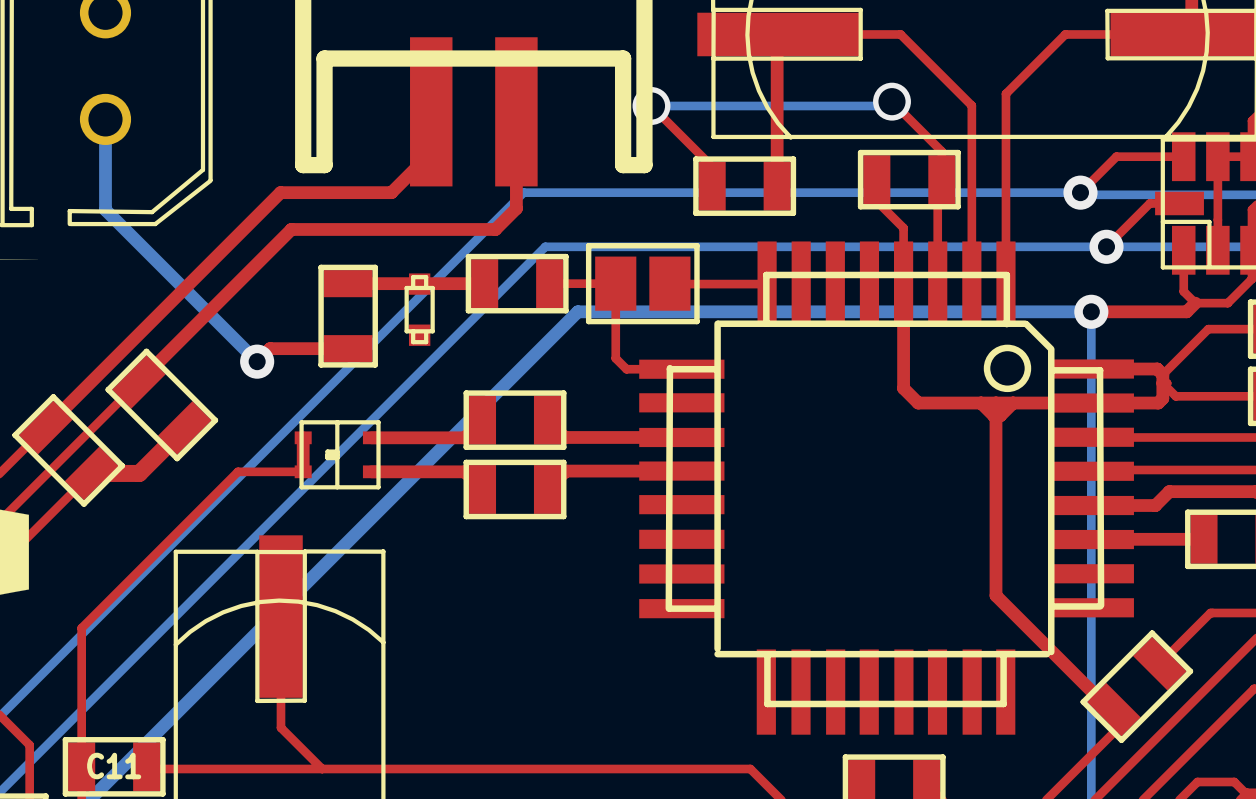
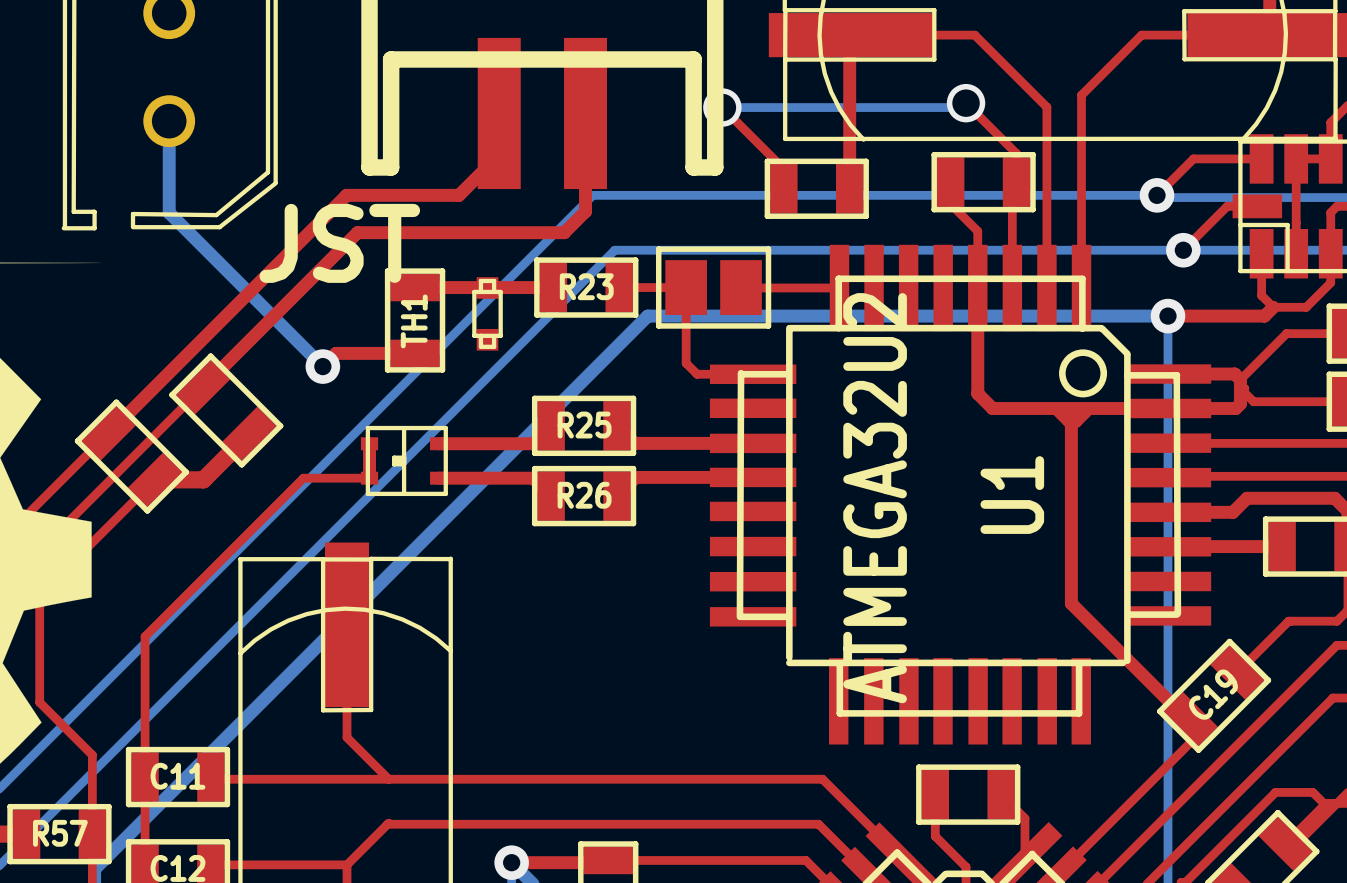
part value: none -> JST (339, 243)
R23 name: none -> R23 (586, 286)
TH1 name: none -> TH1 (414, 321)
R25 name: none -> R25 (584, 425)
R26 name: none -> R26 (584, 495)
U1 name: none -> U1 (1012, 495)
U1 value: none -> ATMEGA32U2 (875, 498)
C19 name: none -> C19 (1213, 694)

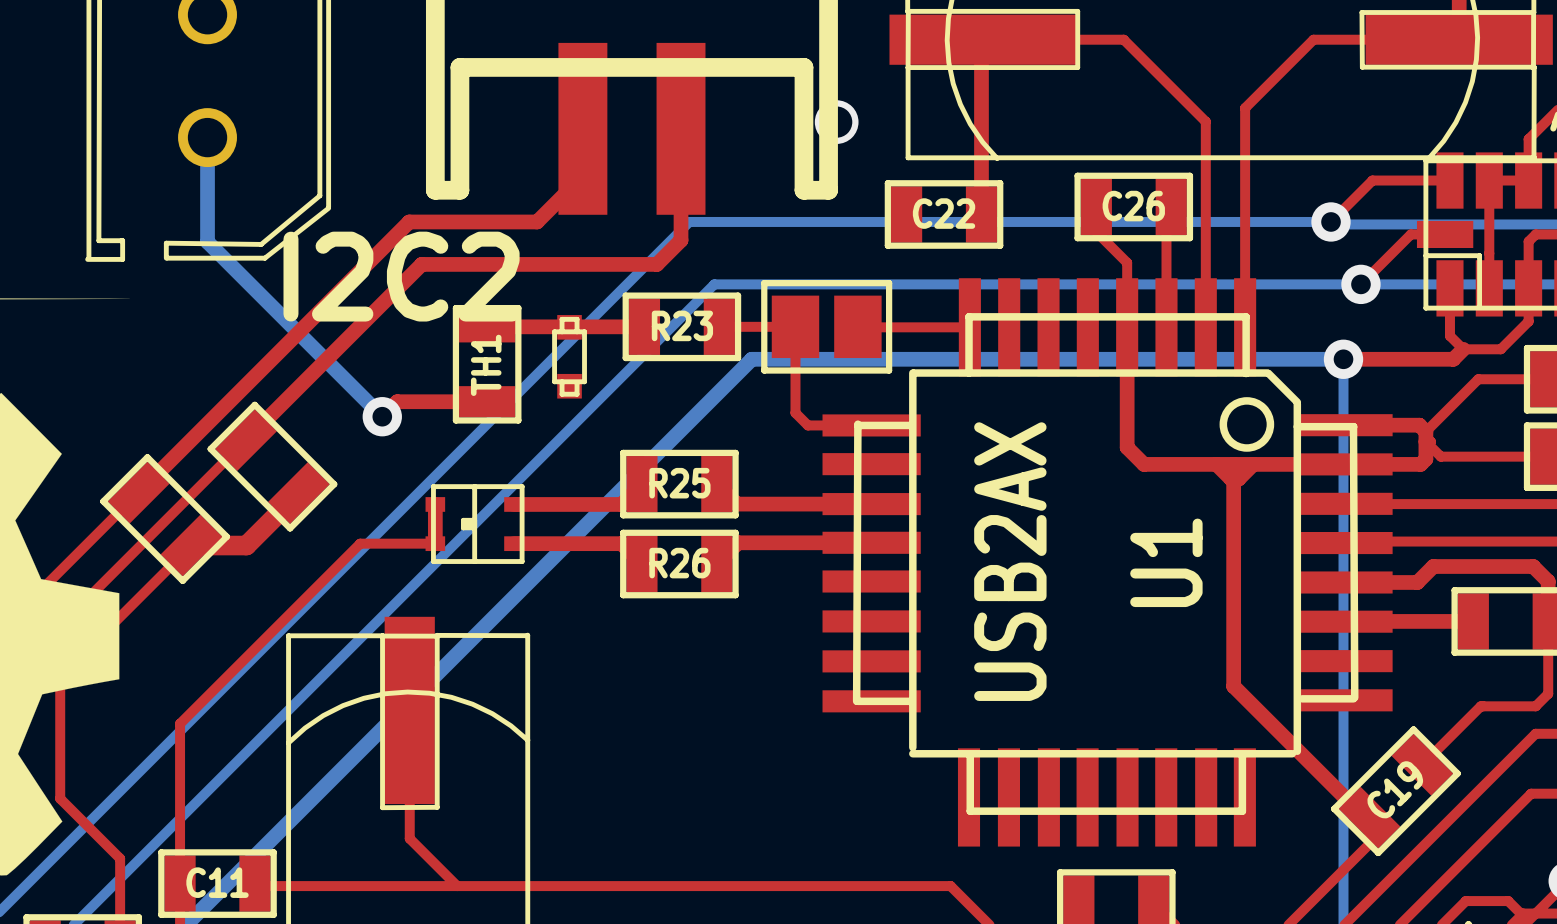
top track: (966, 103) (1016, 153) (1016, 182) -> none
bottom track: (966, 103) (961, 107) (722, 107) -> none
via: (966, 103) -> none
top track: (722, 107) (783, 169) (783, 188) -> none
C26 name: none -> C26 (1133, 206)
C22 name: none -> C22 (944, 213)
part value: JST (339, 243) -> I2C2 (401, 276)
U1 value: ATMEGA32U2 (875, 498) -> USB2AX (1010, 561)

